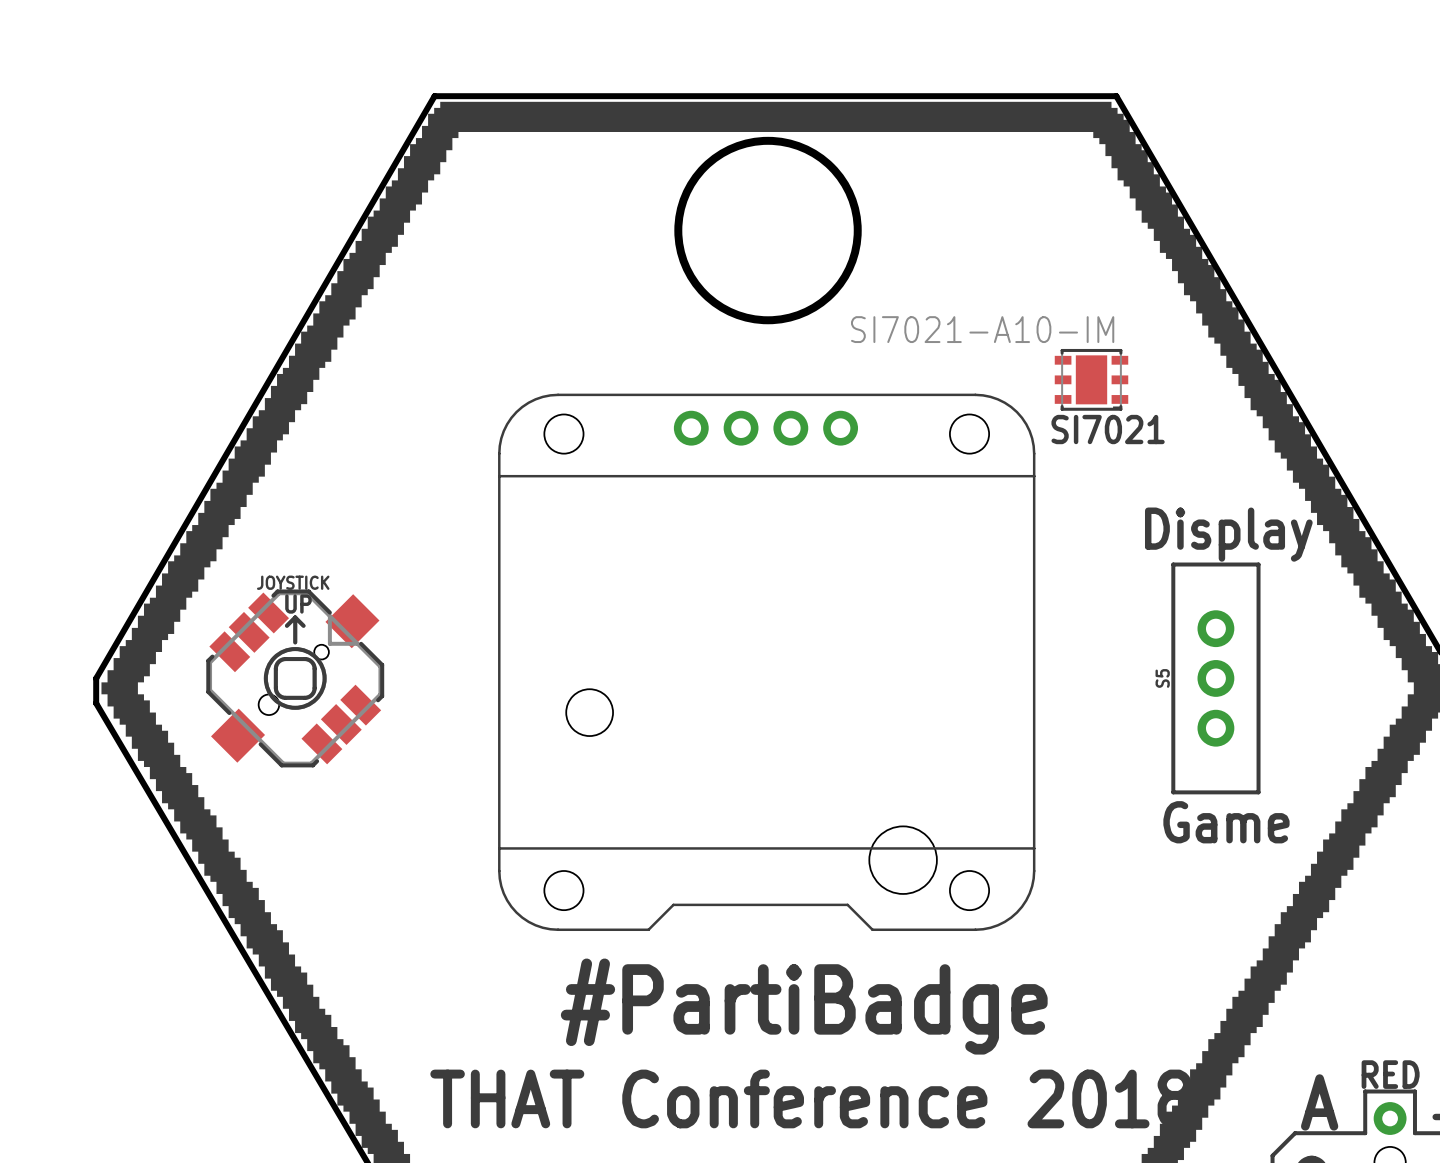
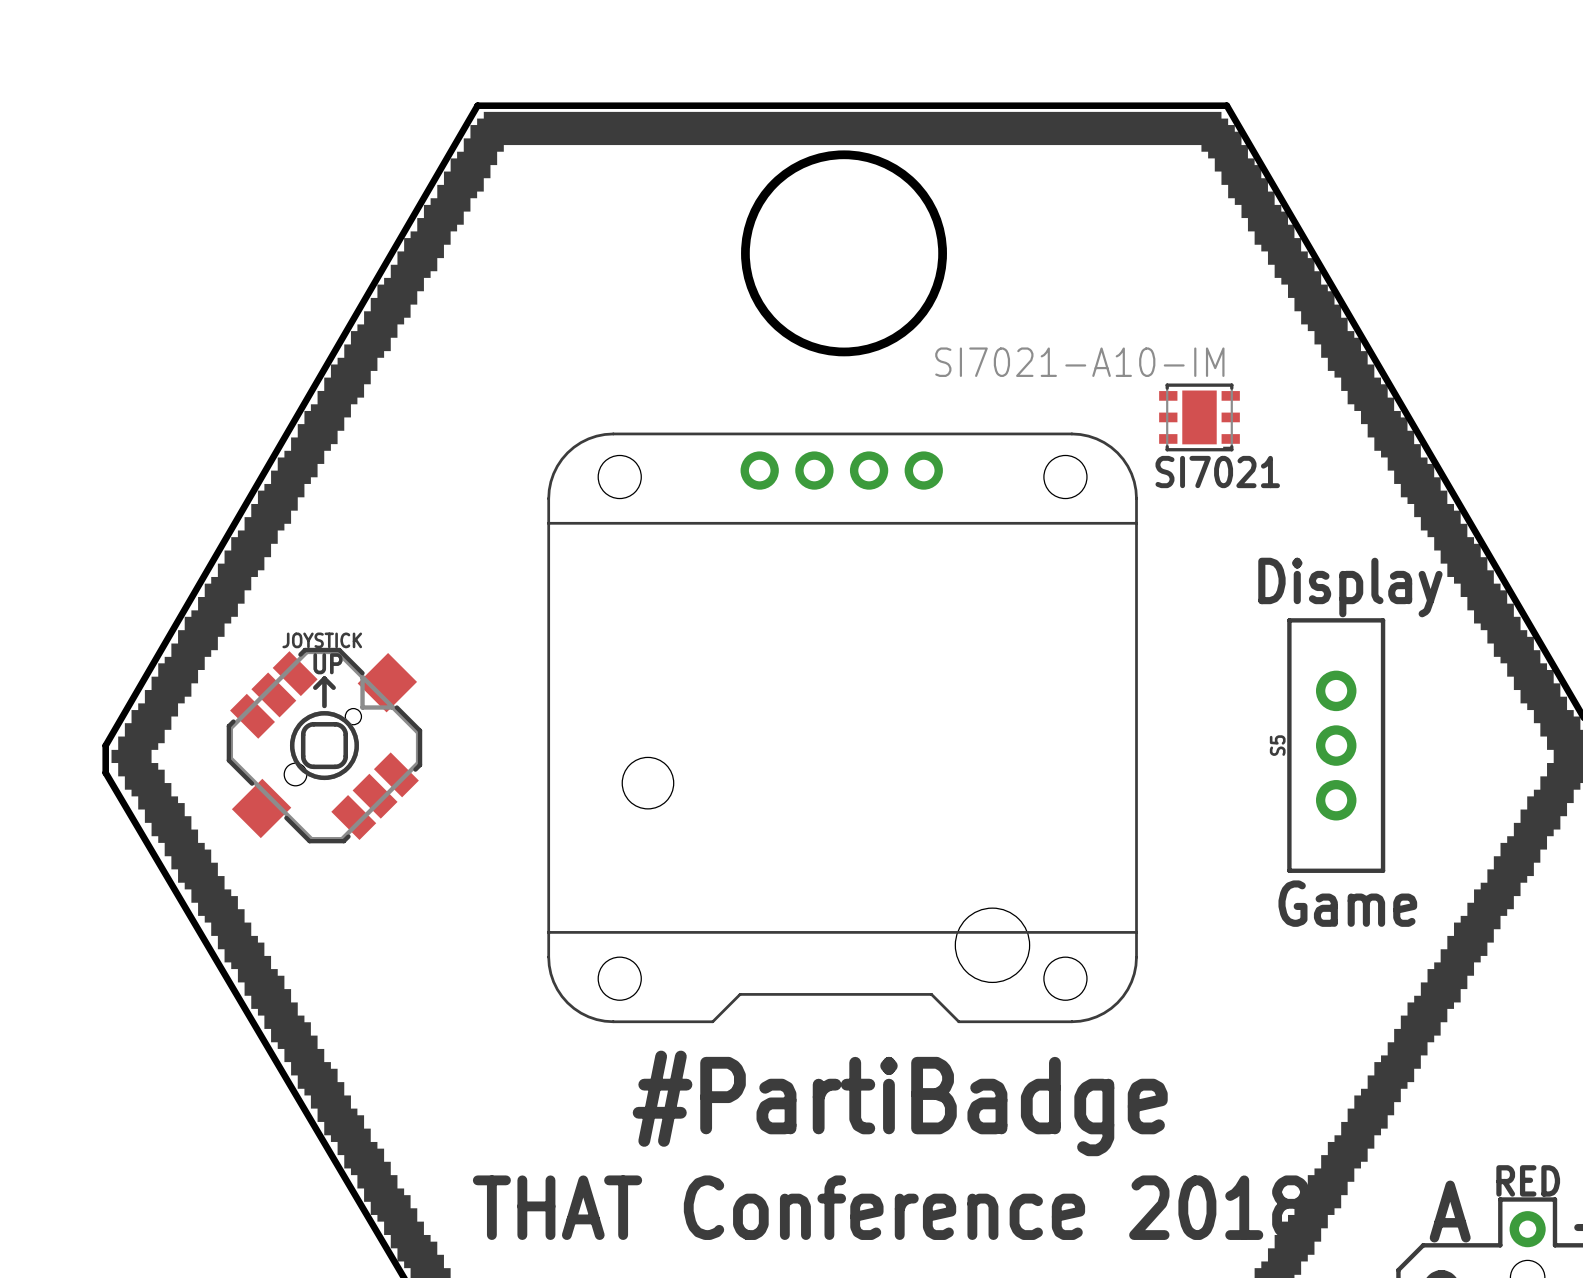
text position: #PartiBadge (804, 1006) -> #PartiBadge (900, 1103)

